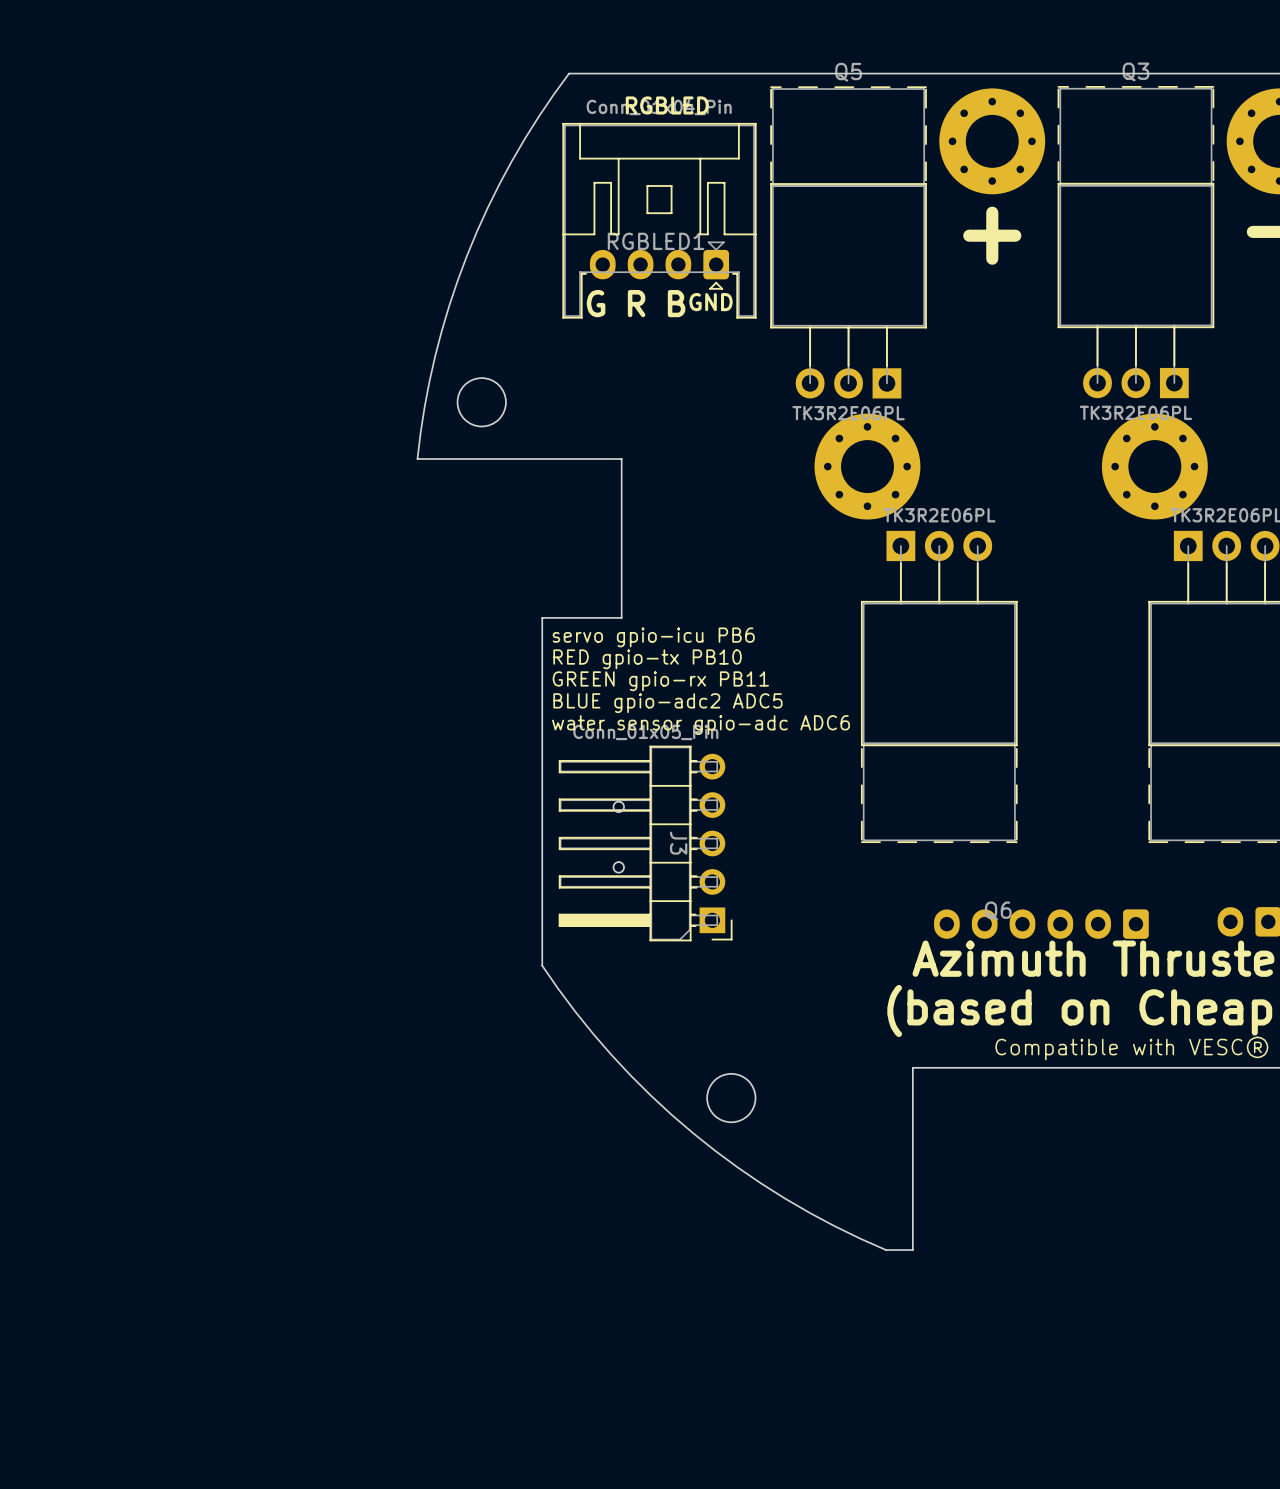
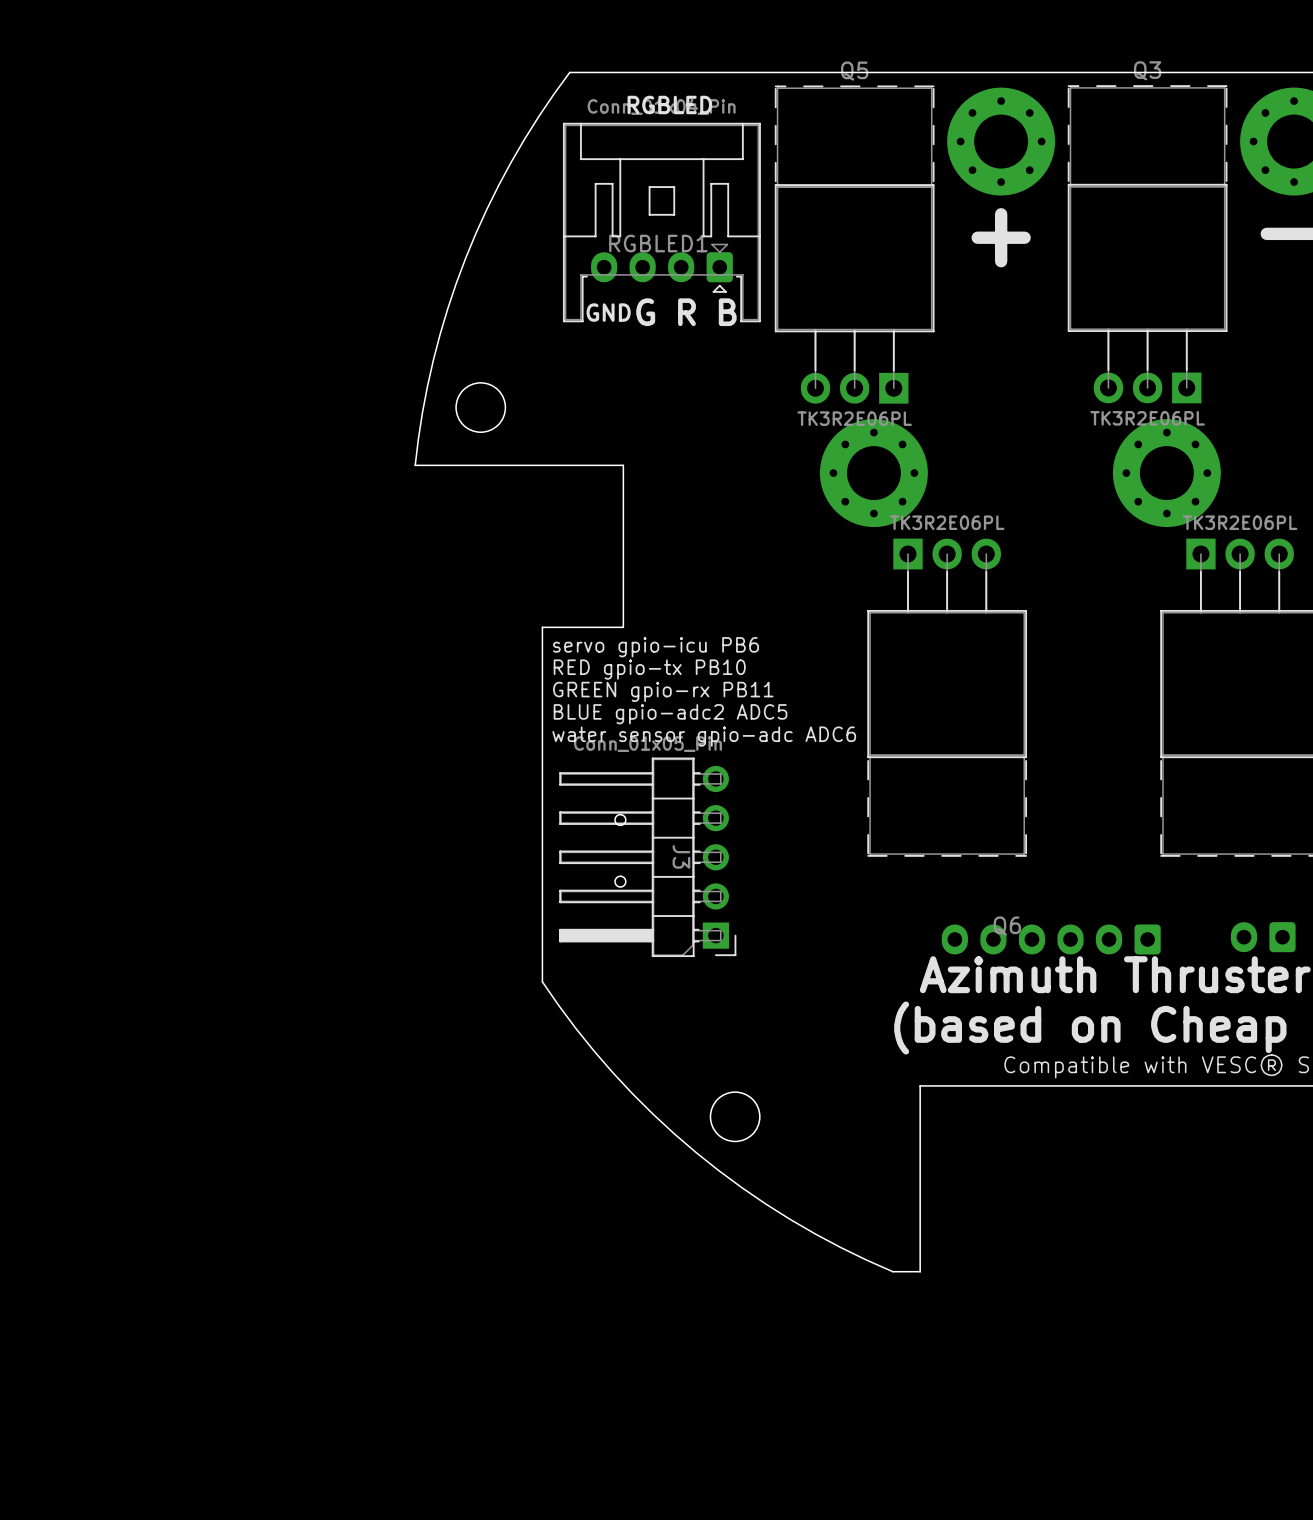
text: GND (710, 302) -> none
text: G R B (636, 303) -> GND (608, 312)
text: none -> G R B (686, 312)

